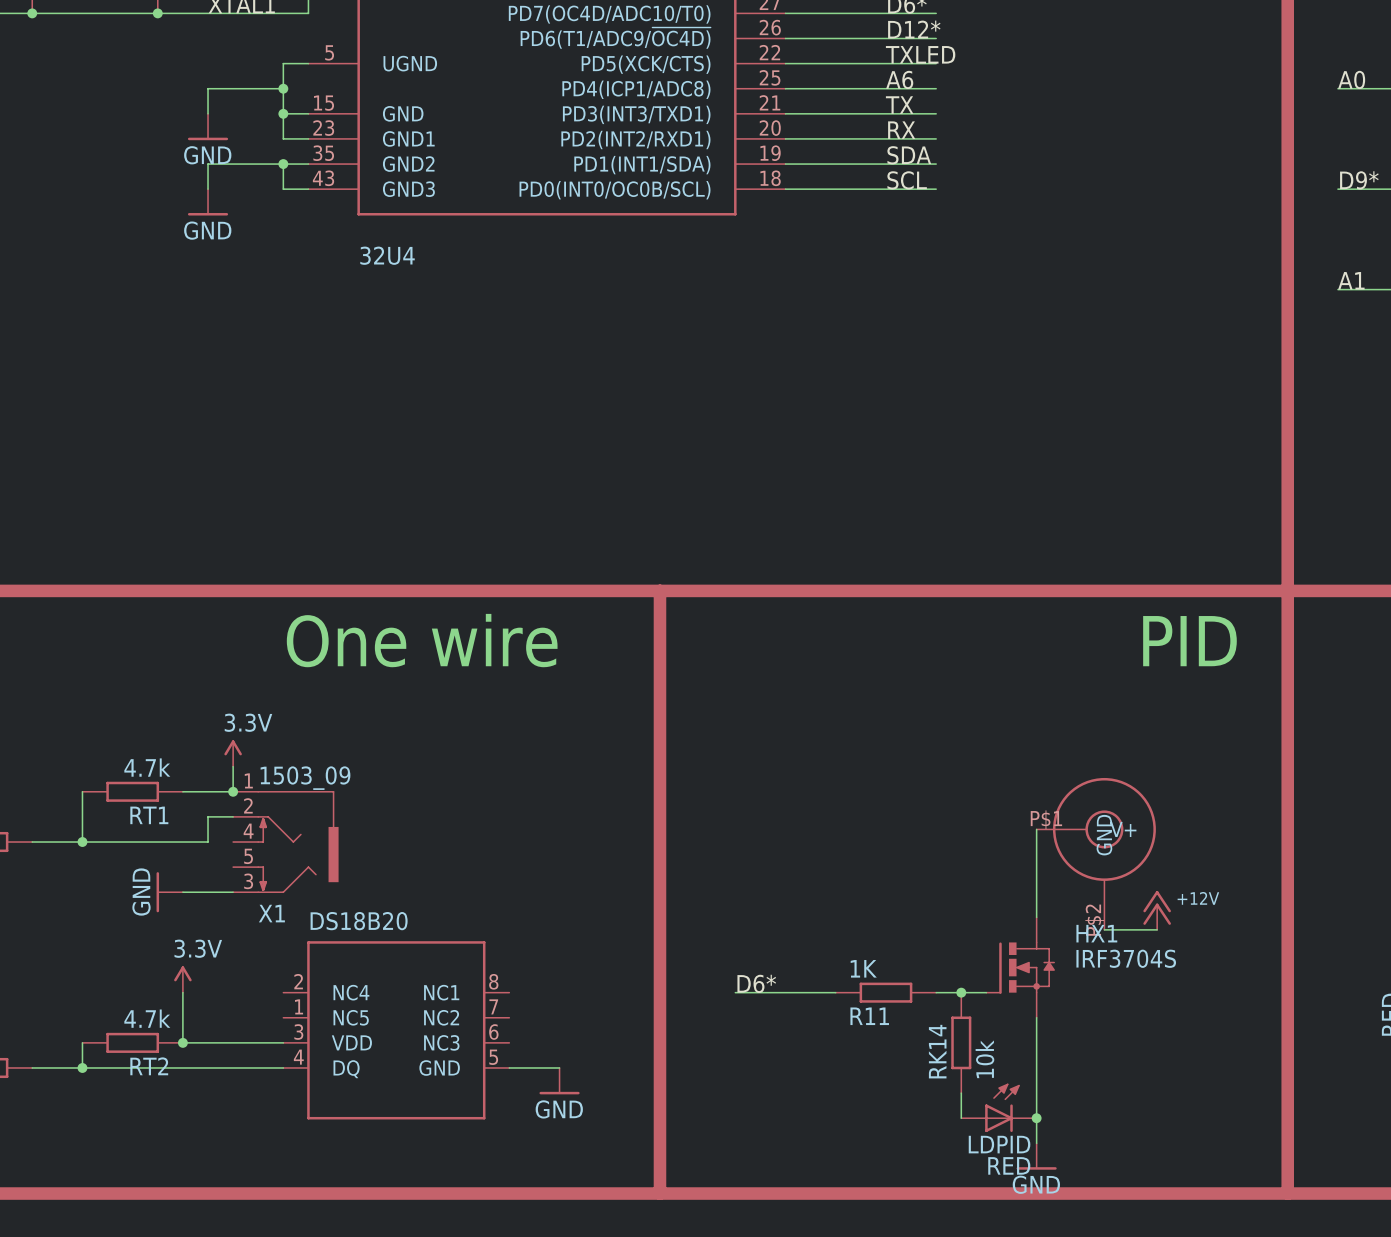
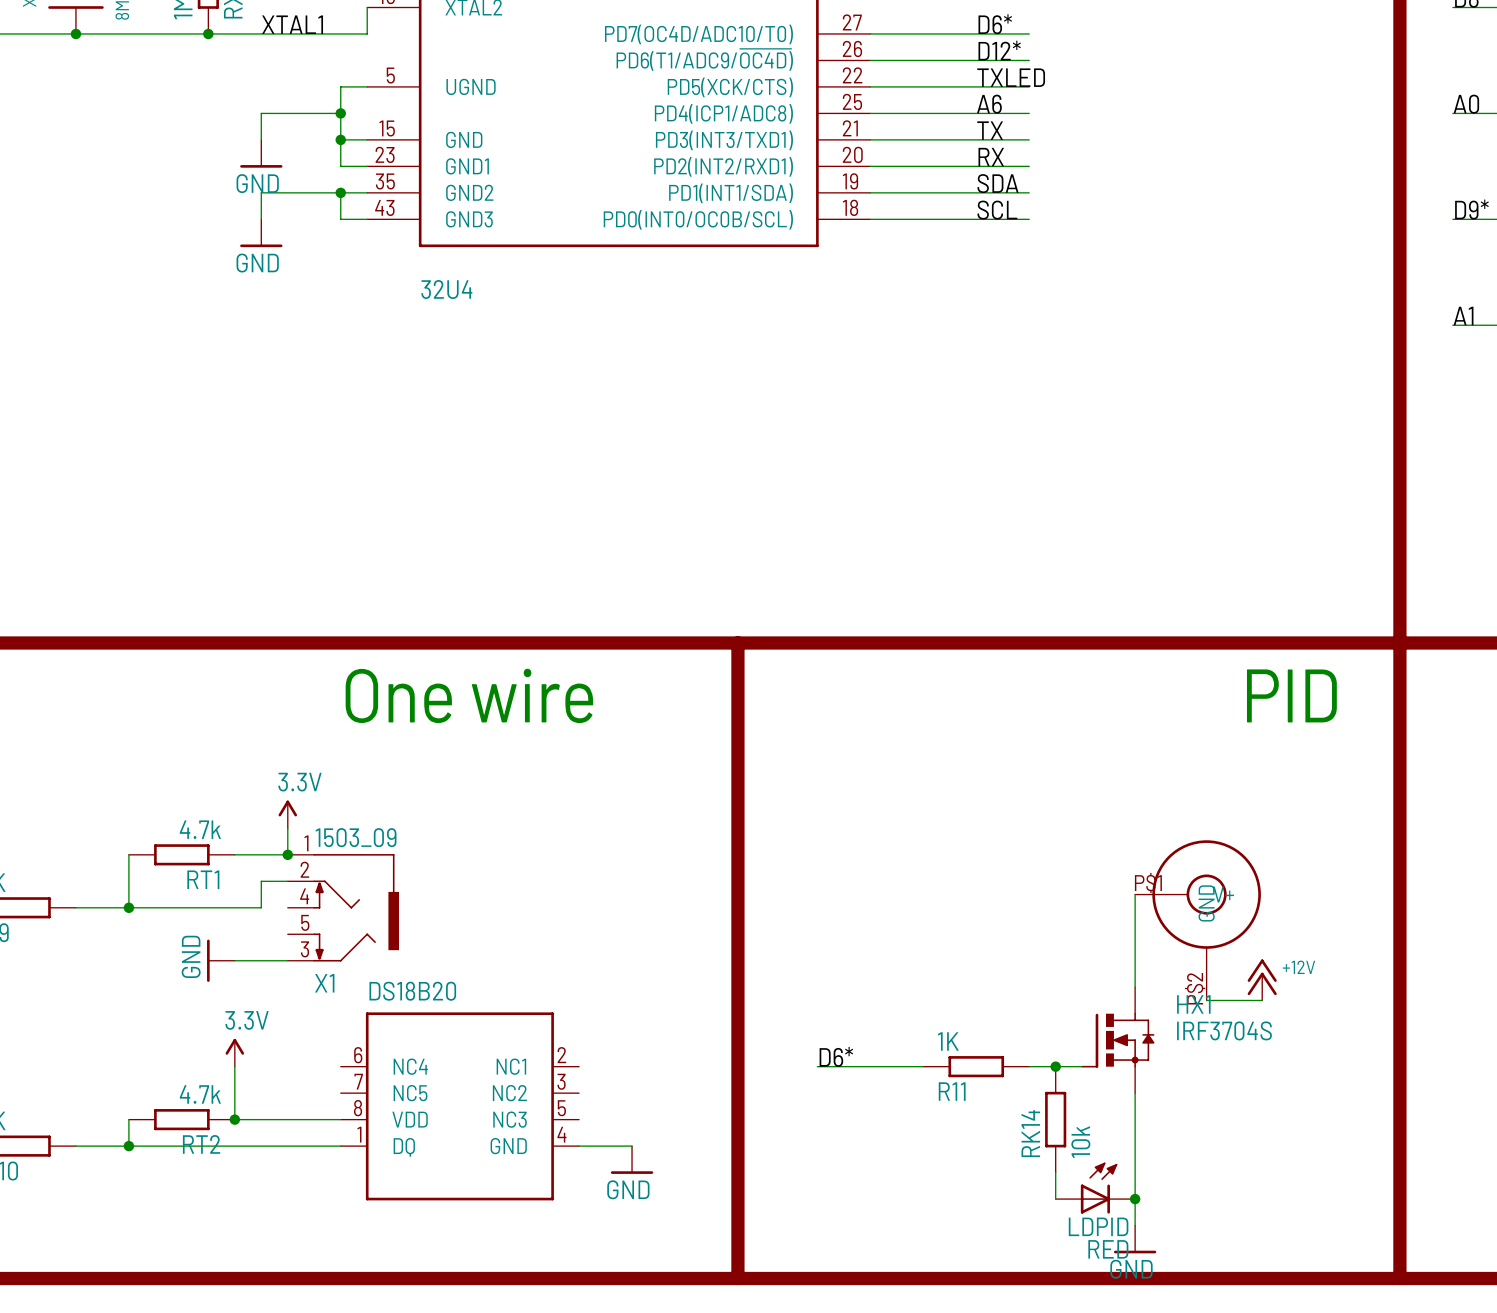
part pin number: 2 (298, 981) -> 6 (358, 1055)
part pin number: 8 (493, 981) -> 2 (561, 1055)
part pin number: 1 (299, 1006) -> 7 (358, 1081)
part pin number: 7 (493, 1006) -> 3 (561, 1081)
part pin number: 3 (298, 1032) -> 8 (358, 1108)
part pin number: 6 (493, 1032) -> 5 (561, 1108)
part pin number: 4 (298, 1057) -> 1 (359, 1134)
part pin number: 5 (493, 1057) -> 4 (561, 1134)

